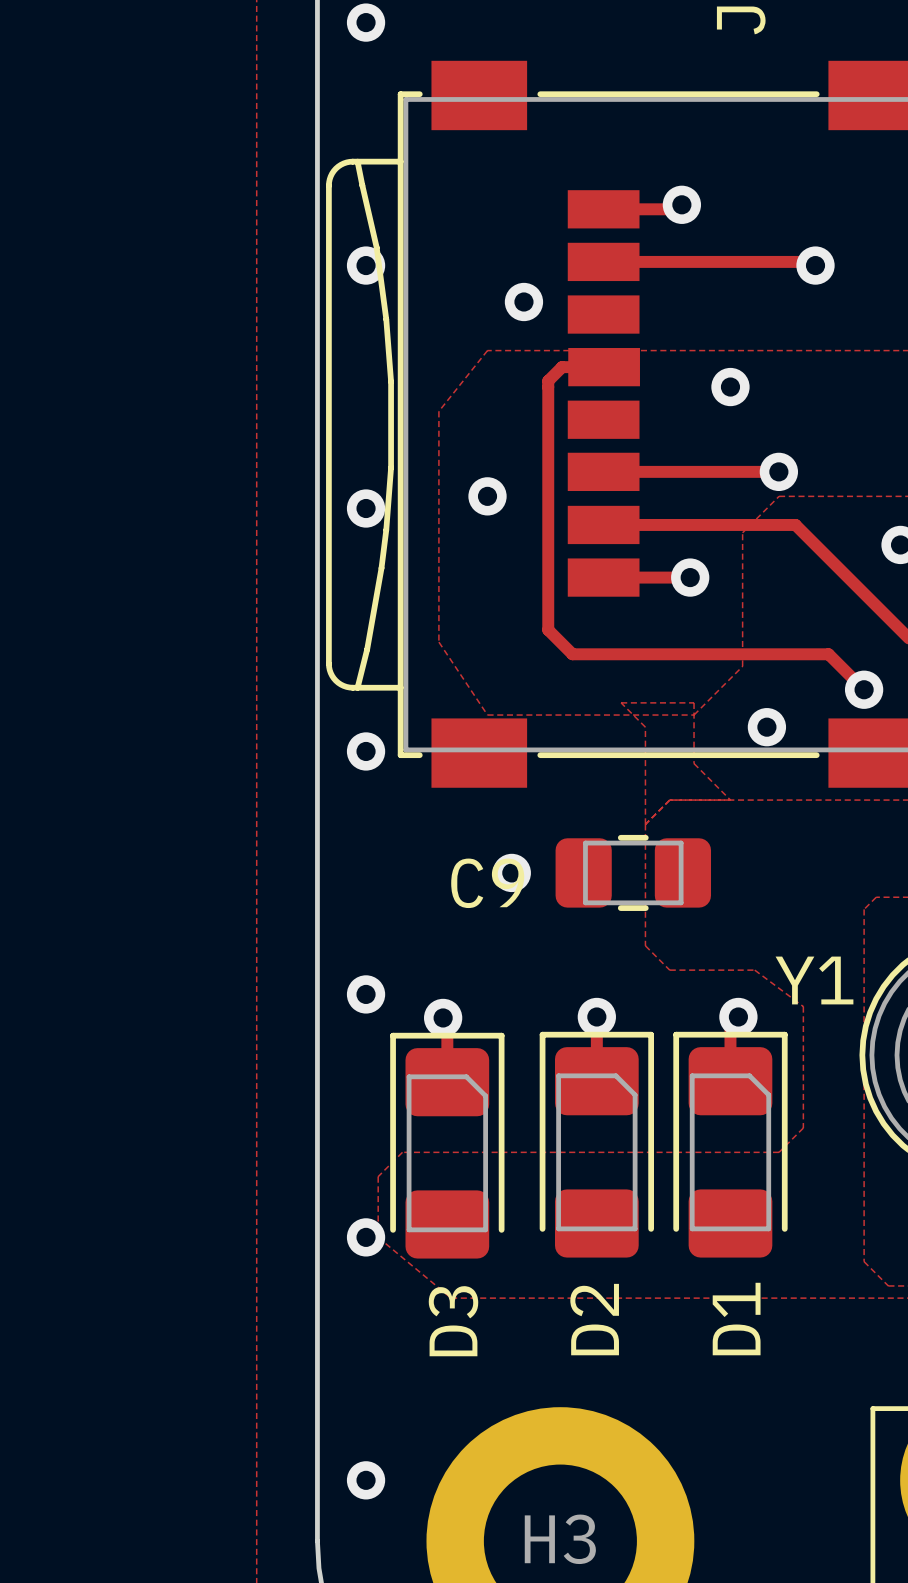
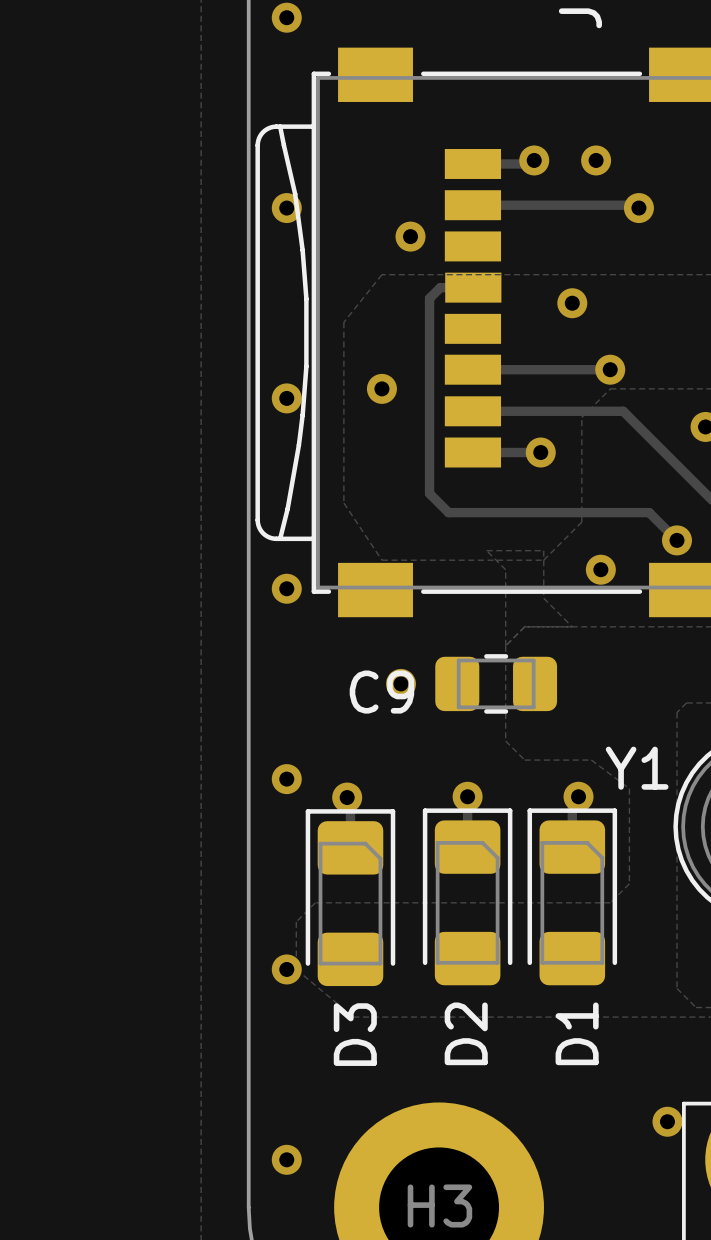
via: none -> (596, 160)
via: none -> (667, 1121)

